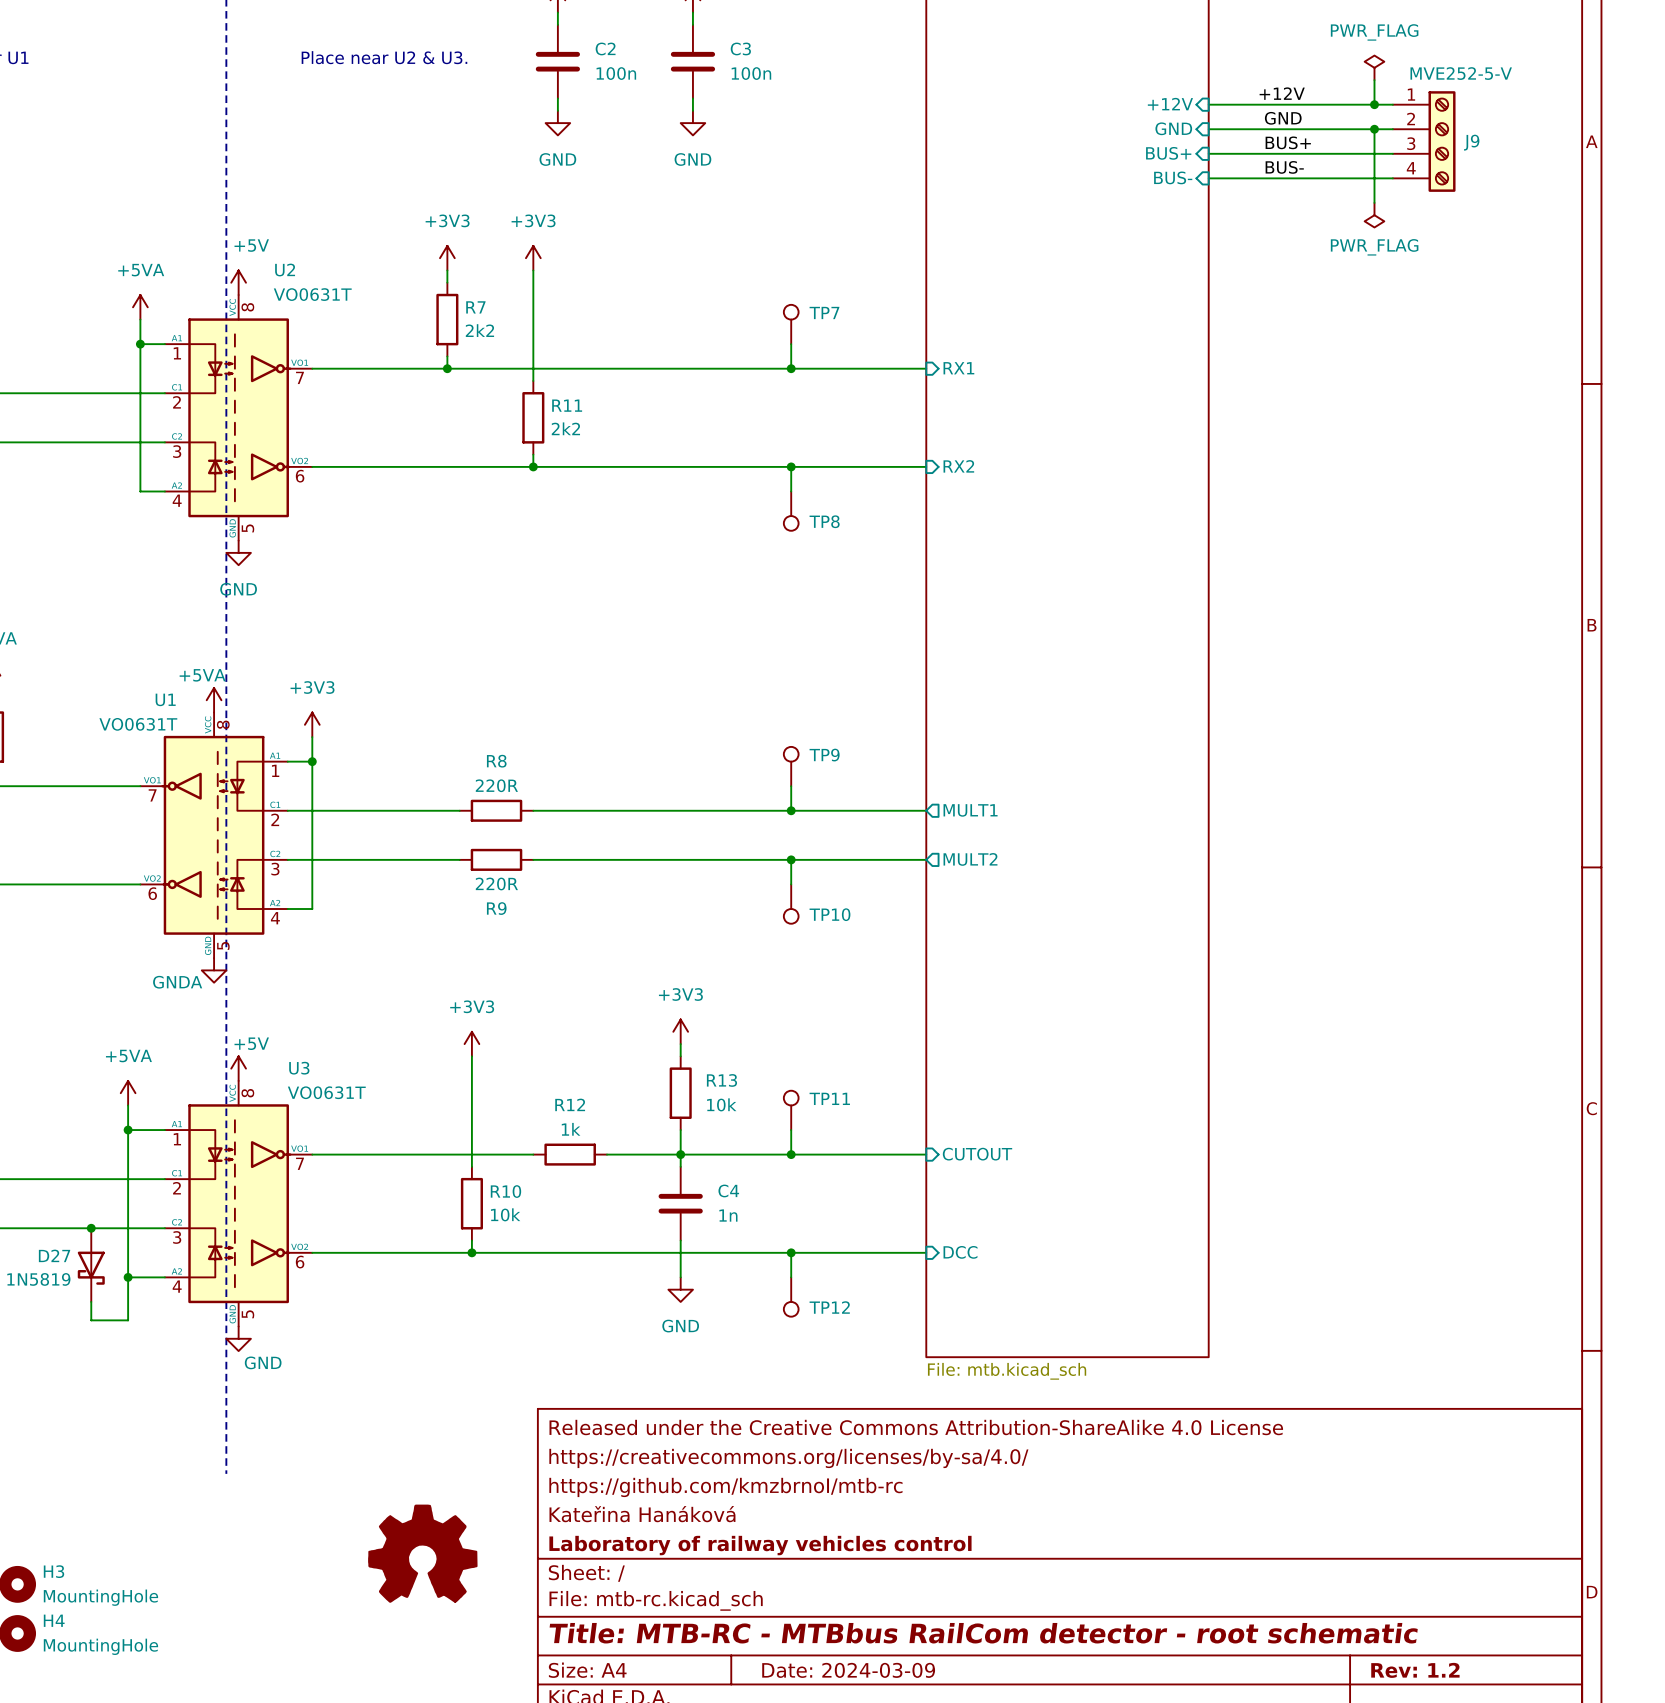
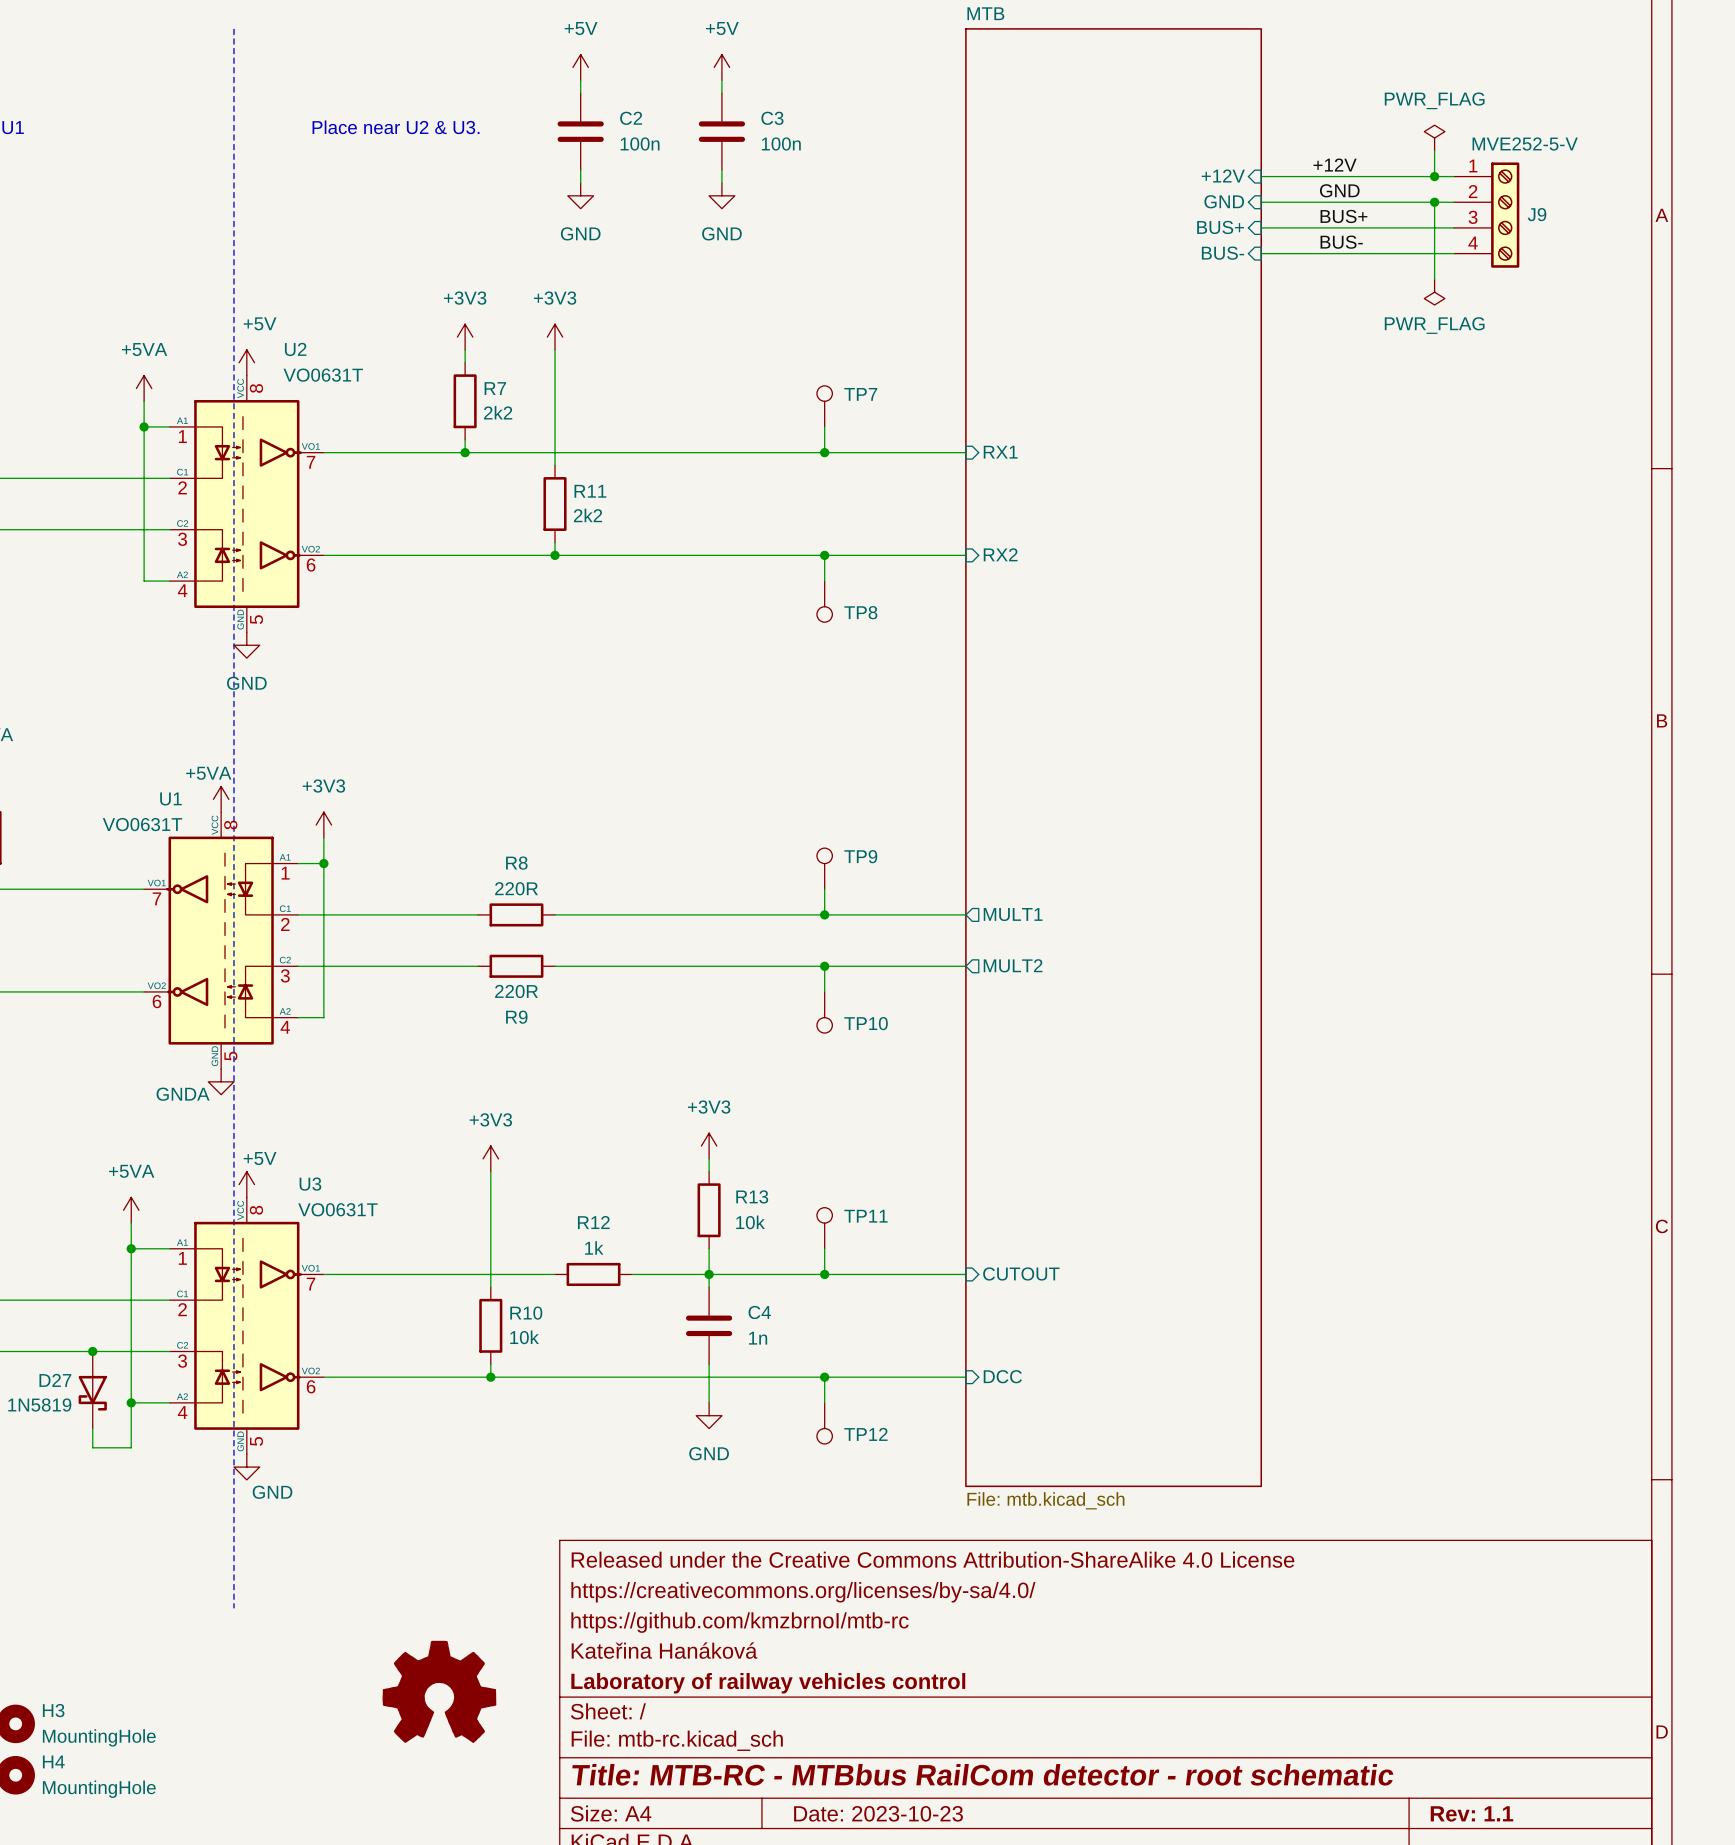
title block: Date: 2024-03-09 (848, 1670) -> Date: 2023-10-23 (878, 1813)
title block: Rev: 1.2 (1415, 1670) -> Rev: 1.1 (1471, 1813)

